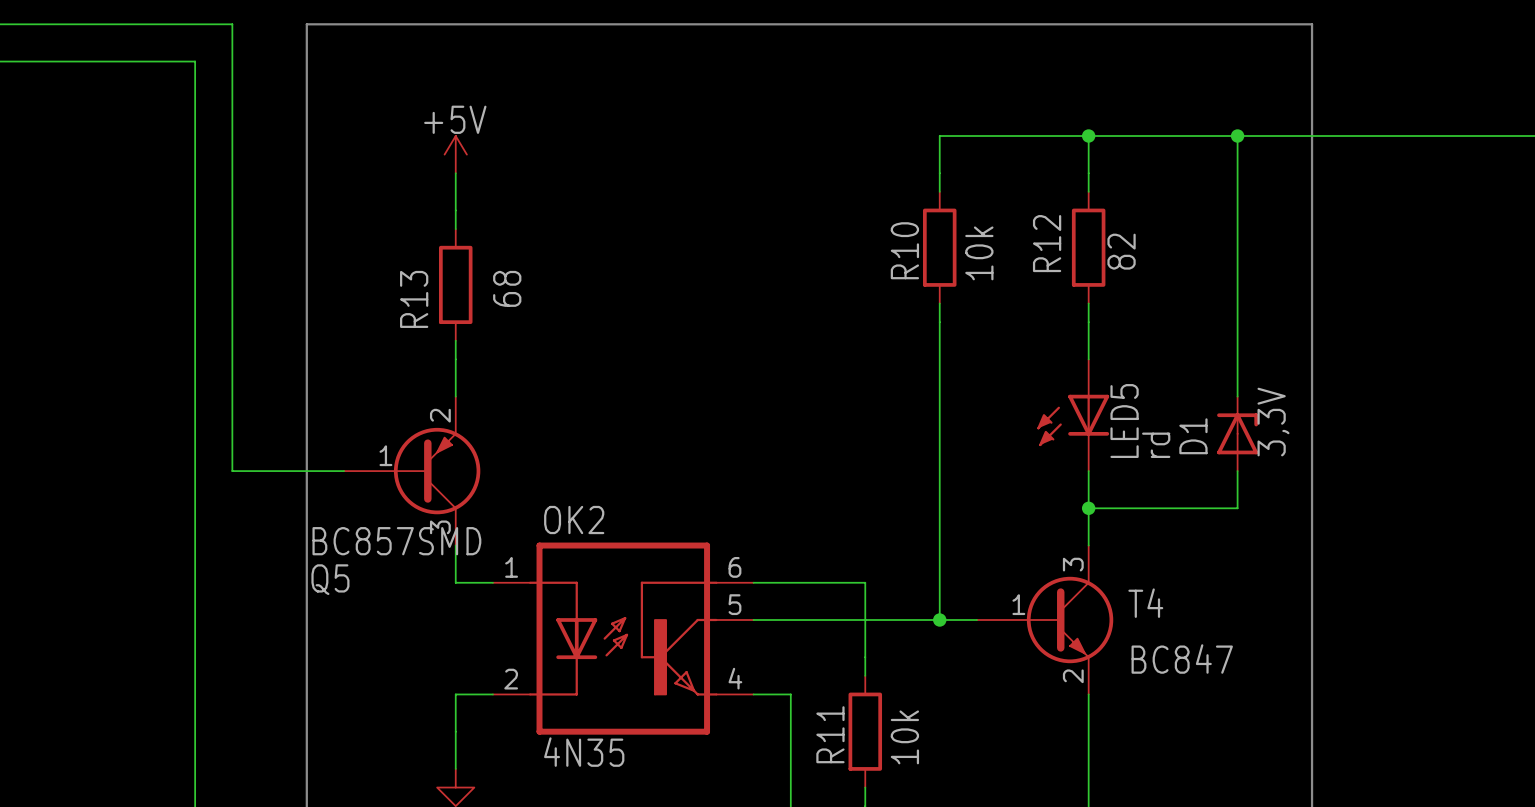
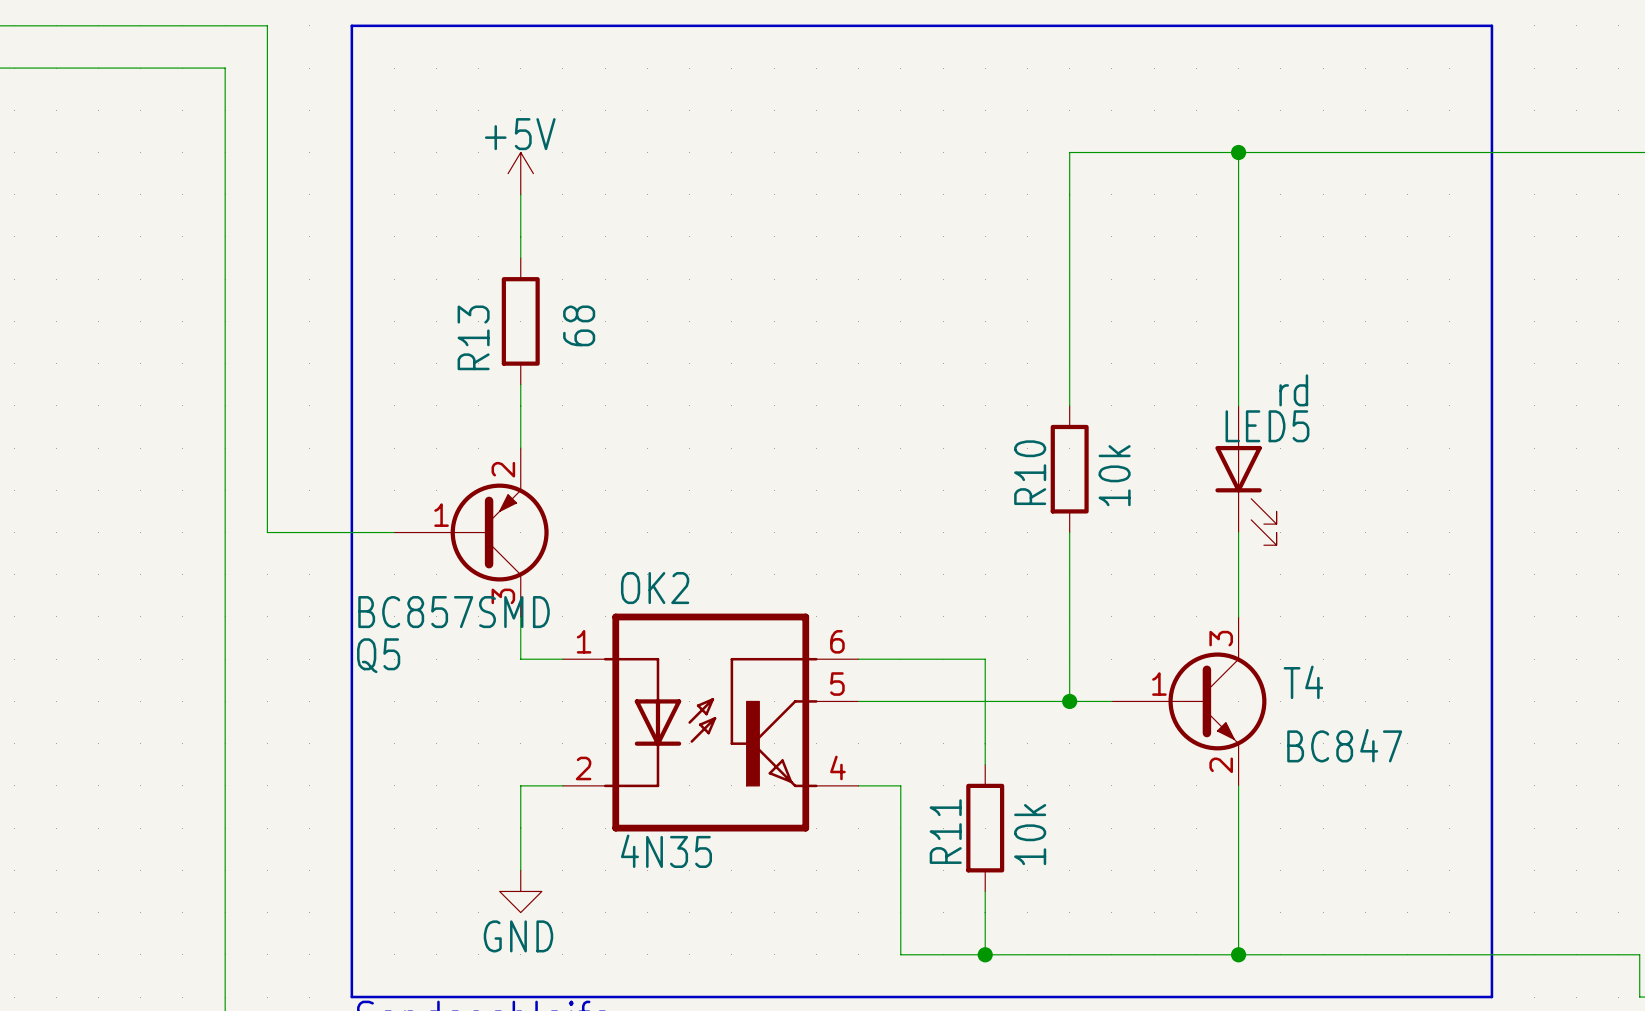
wire: (1237, 136) (1237, 396) -> none
junction: (1237, 136) -> none
wire: none -> (1238, 215) (1238, 342)
R10 position: (939, 247) -> (1069, 469)
R12: 82 (1088, 247) -> none
wire: (939, 359) (939, 471) -> (1069, 215) (1069, 342)
LED5 symbol: [1037, 359, 1110, 472] -> [1215, 405, 1277, 546]
LED5 name position: LED5 (1124, 421) -> LED5 (1267, 426)
D1: 3,3V (1237, 433) -> none
LED5 value position: rd (1156, 445) -> rd (1293, 390)
wire: (1237, 471) (1237, 508) (1088, 508) -> none
junction: (1088, 508) -> none

